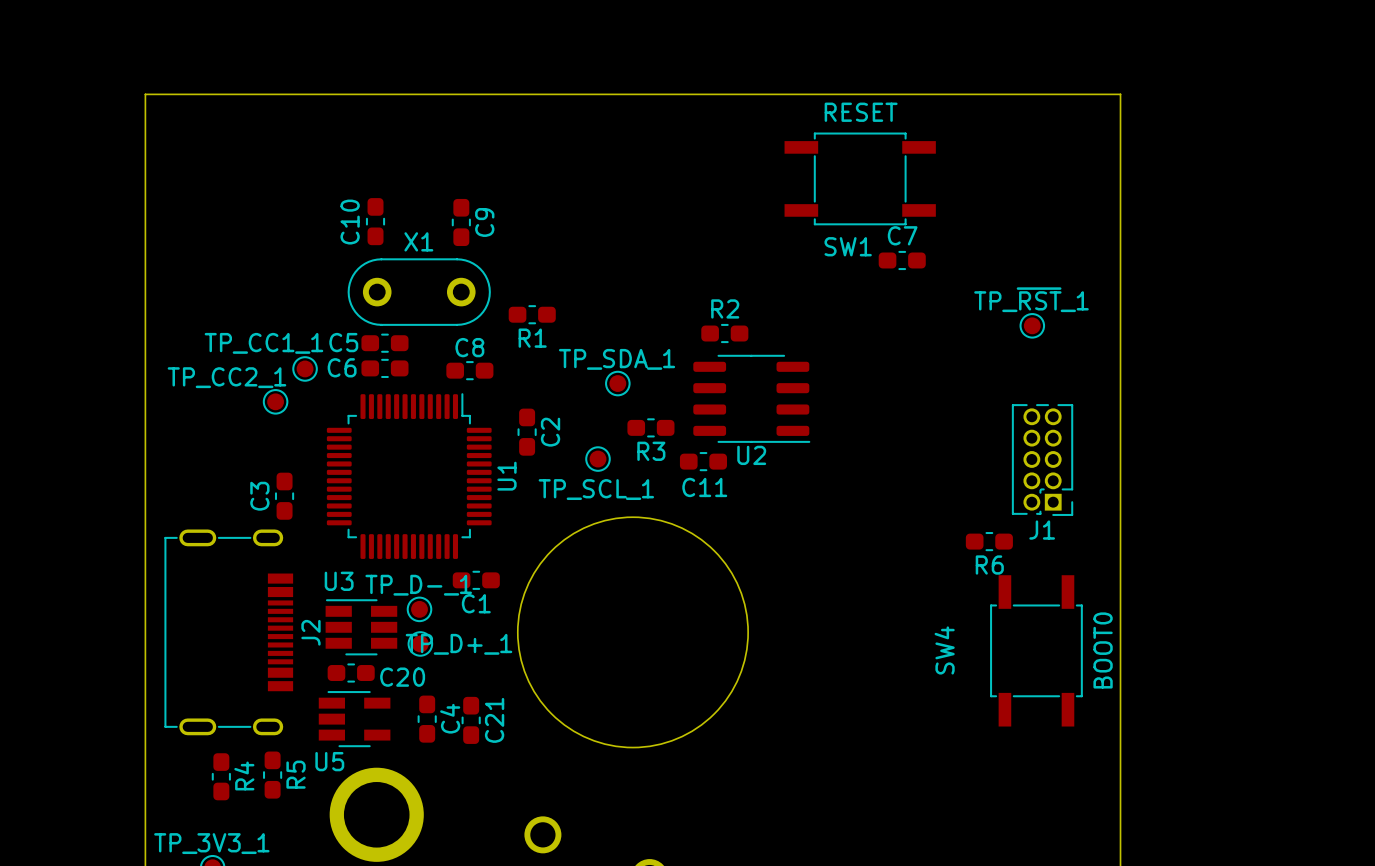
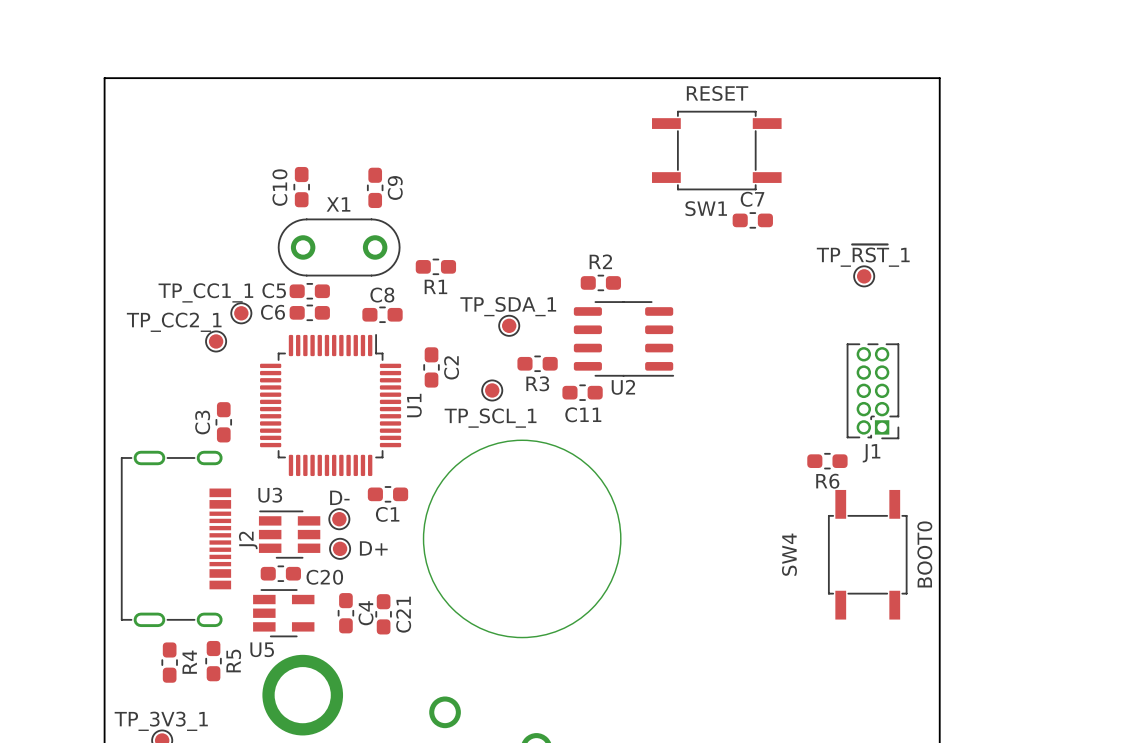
TP_D-_1 name: TP_D-_1 (418, 585) -> D- (339, 497)
TP_D+_1 name: TP_D+_1 (458, 644) -> D+ (373, 548)

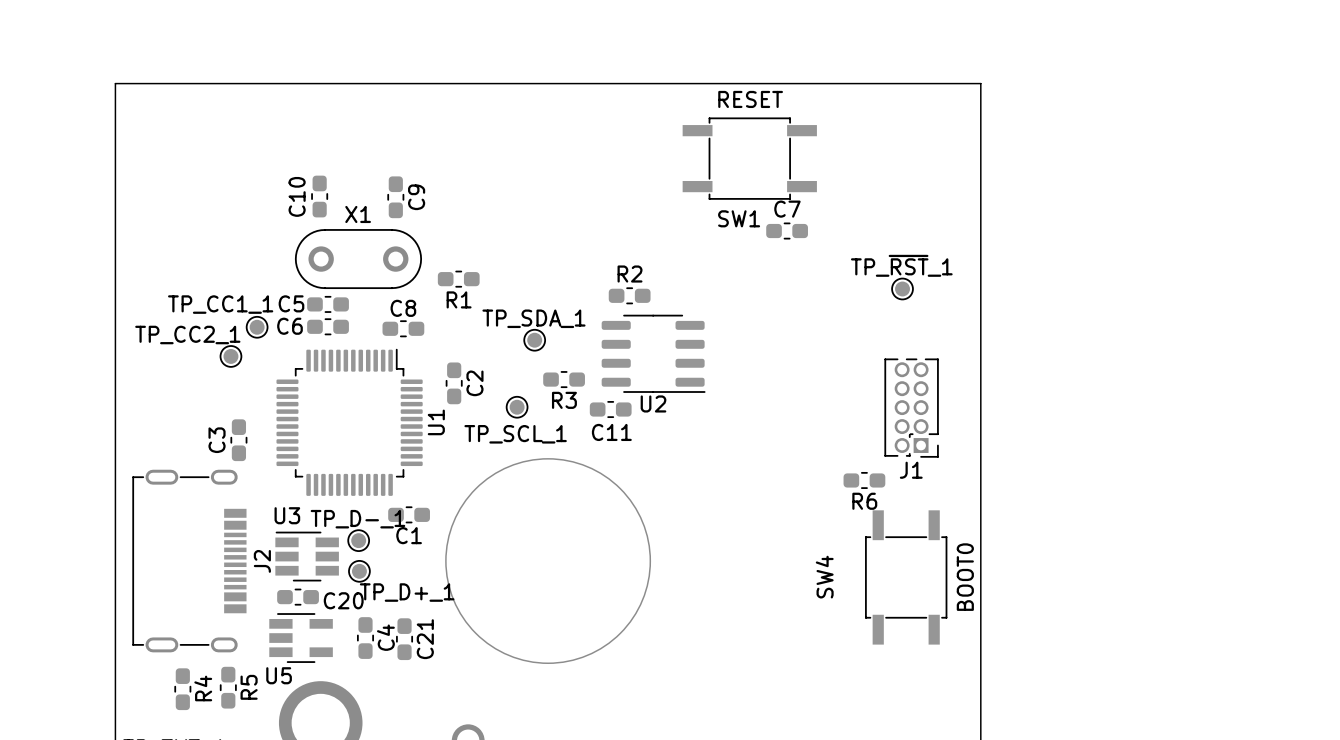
D- name: D- (339, 497) -> TP_D-_1 (357, 519)
D+ name: D+ (373, 548) -> TP_D+_1 (407, 592)

